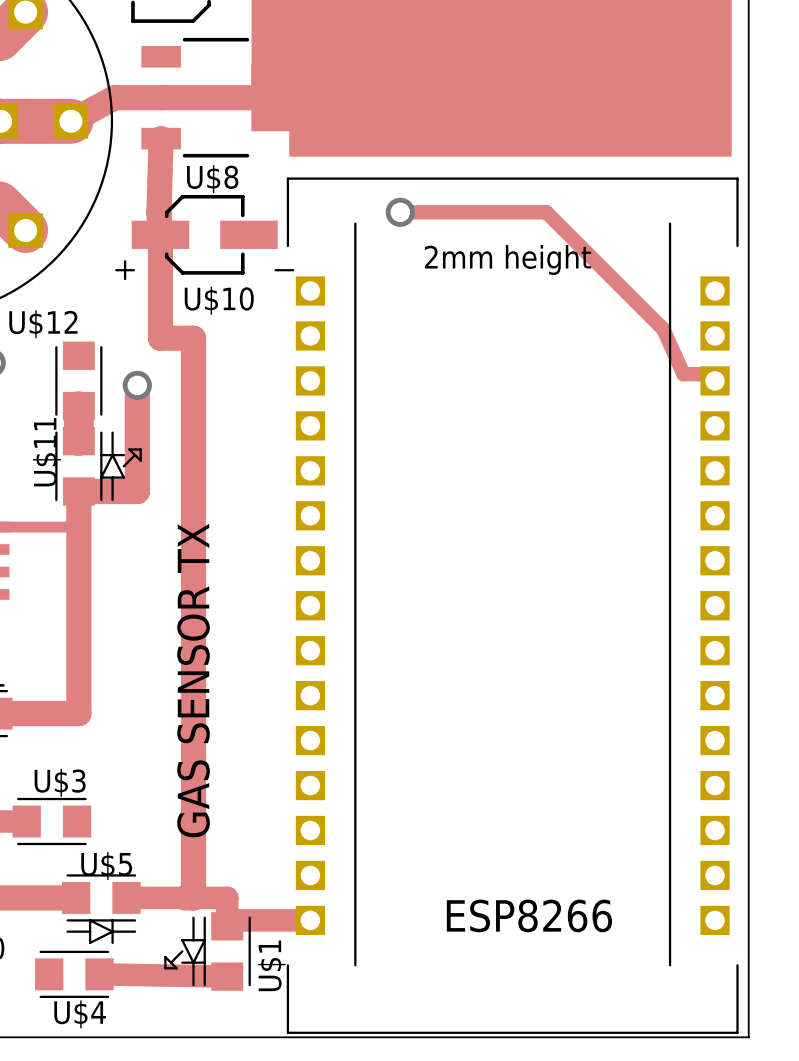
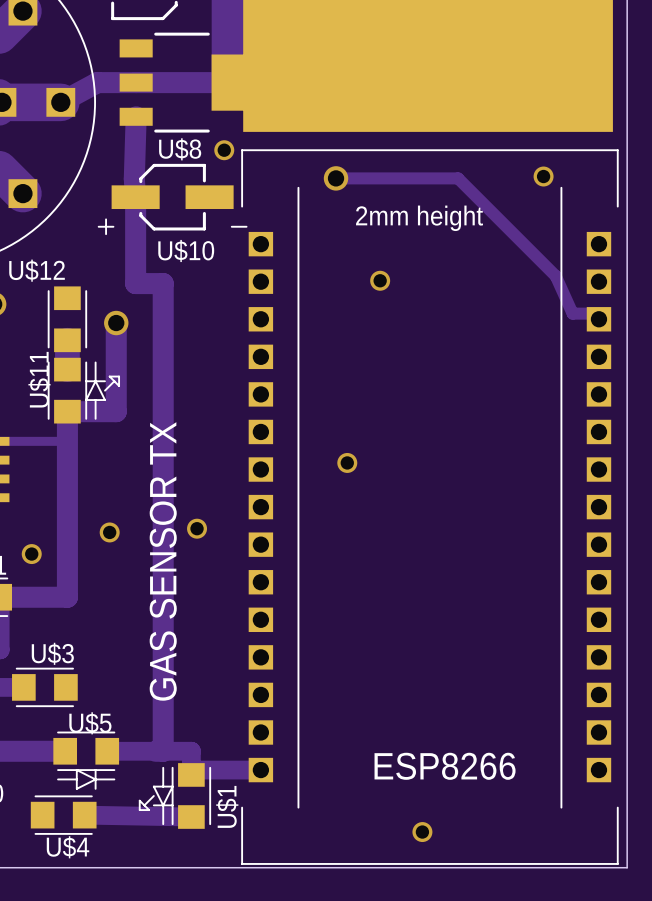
via: none -> (224, 150)
via: none -> (543, 176)
via: none -> (380, 280)
via: none -> (347, 462)
via: none -> (197, 528)
via: none -> (109, 532)
via: none -> (31, 554)
via: none -> (422, 832)

